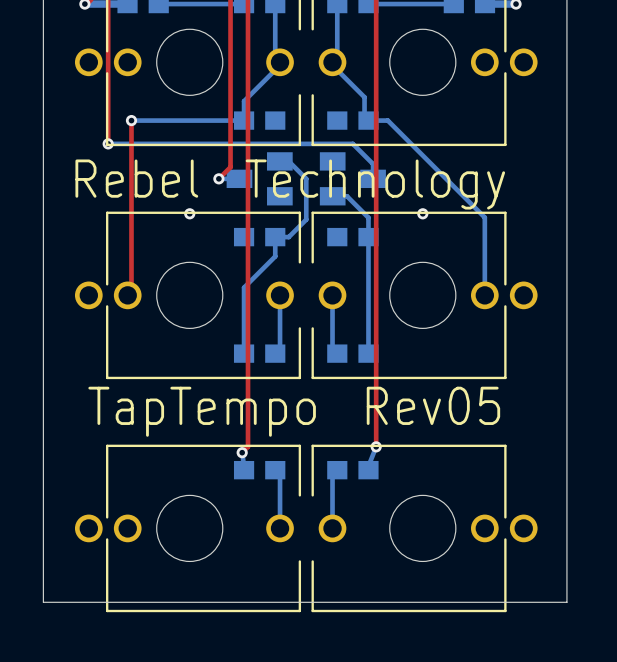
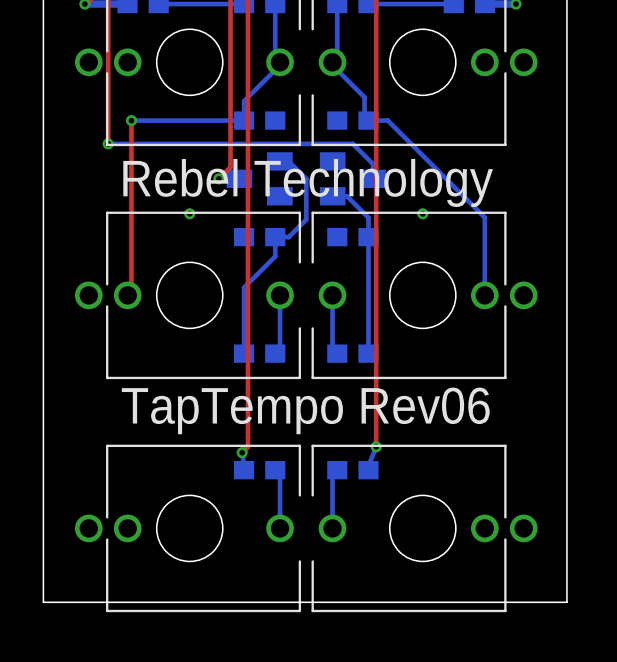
text: Rebel (136, 178) -> none
text: Technology (375, 184) -> Rebel Technology (308, 183)
text: Rev05 (433, 405) -> none
text: TapTempo (202, 411) -> TapTempo Rev06 (305, 410)

